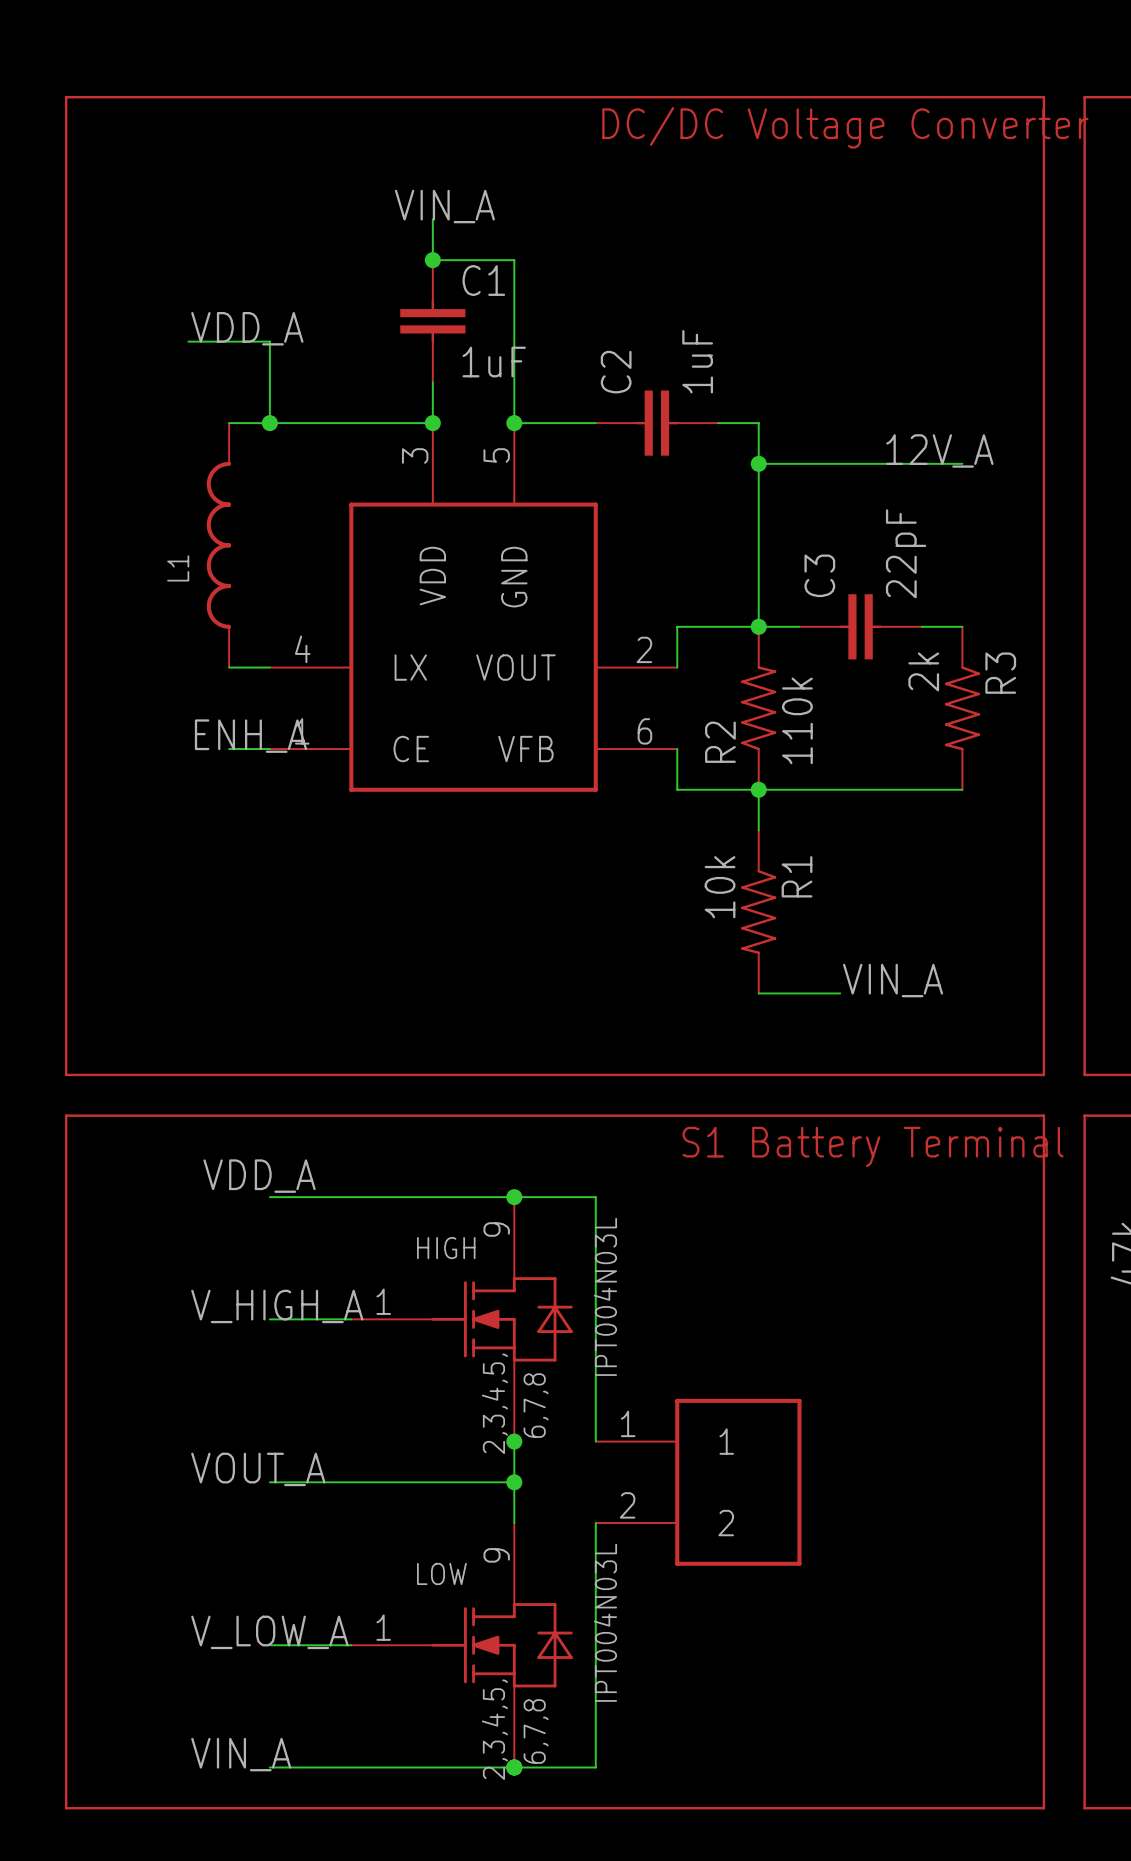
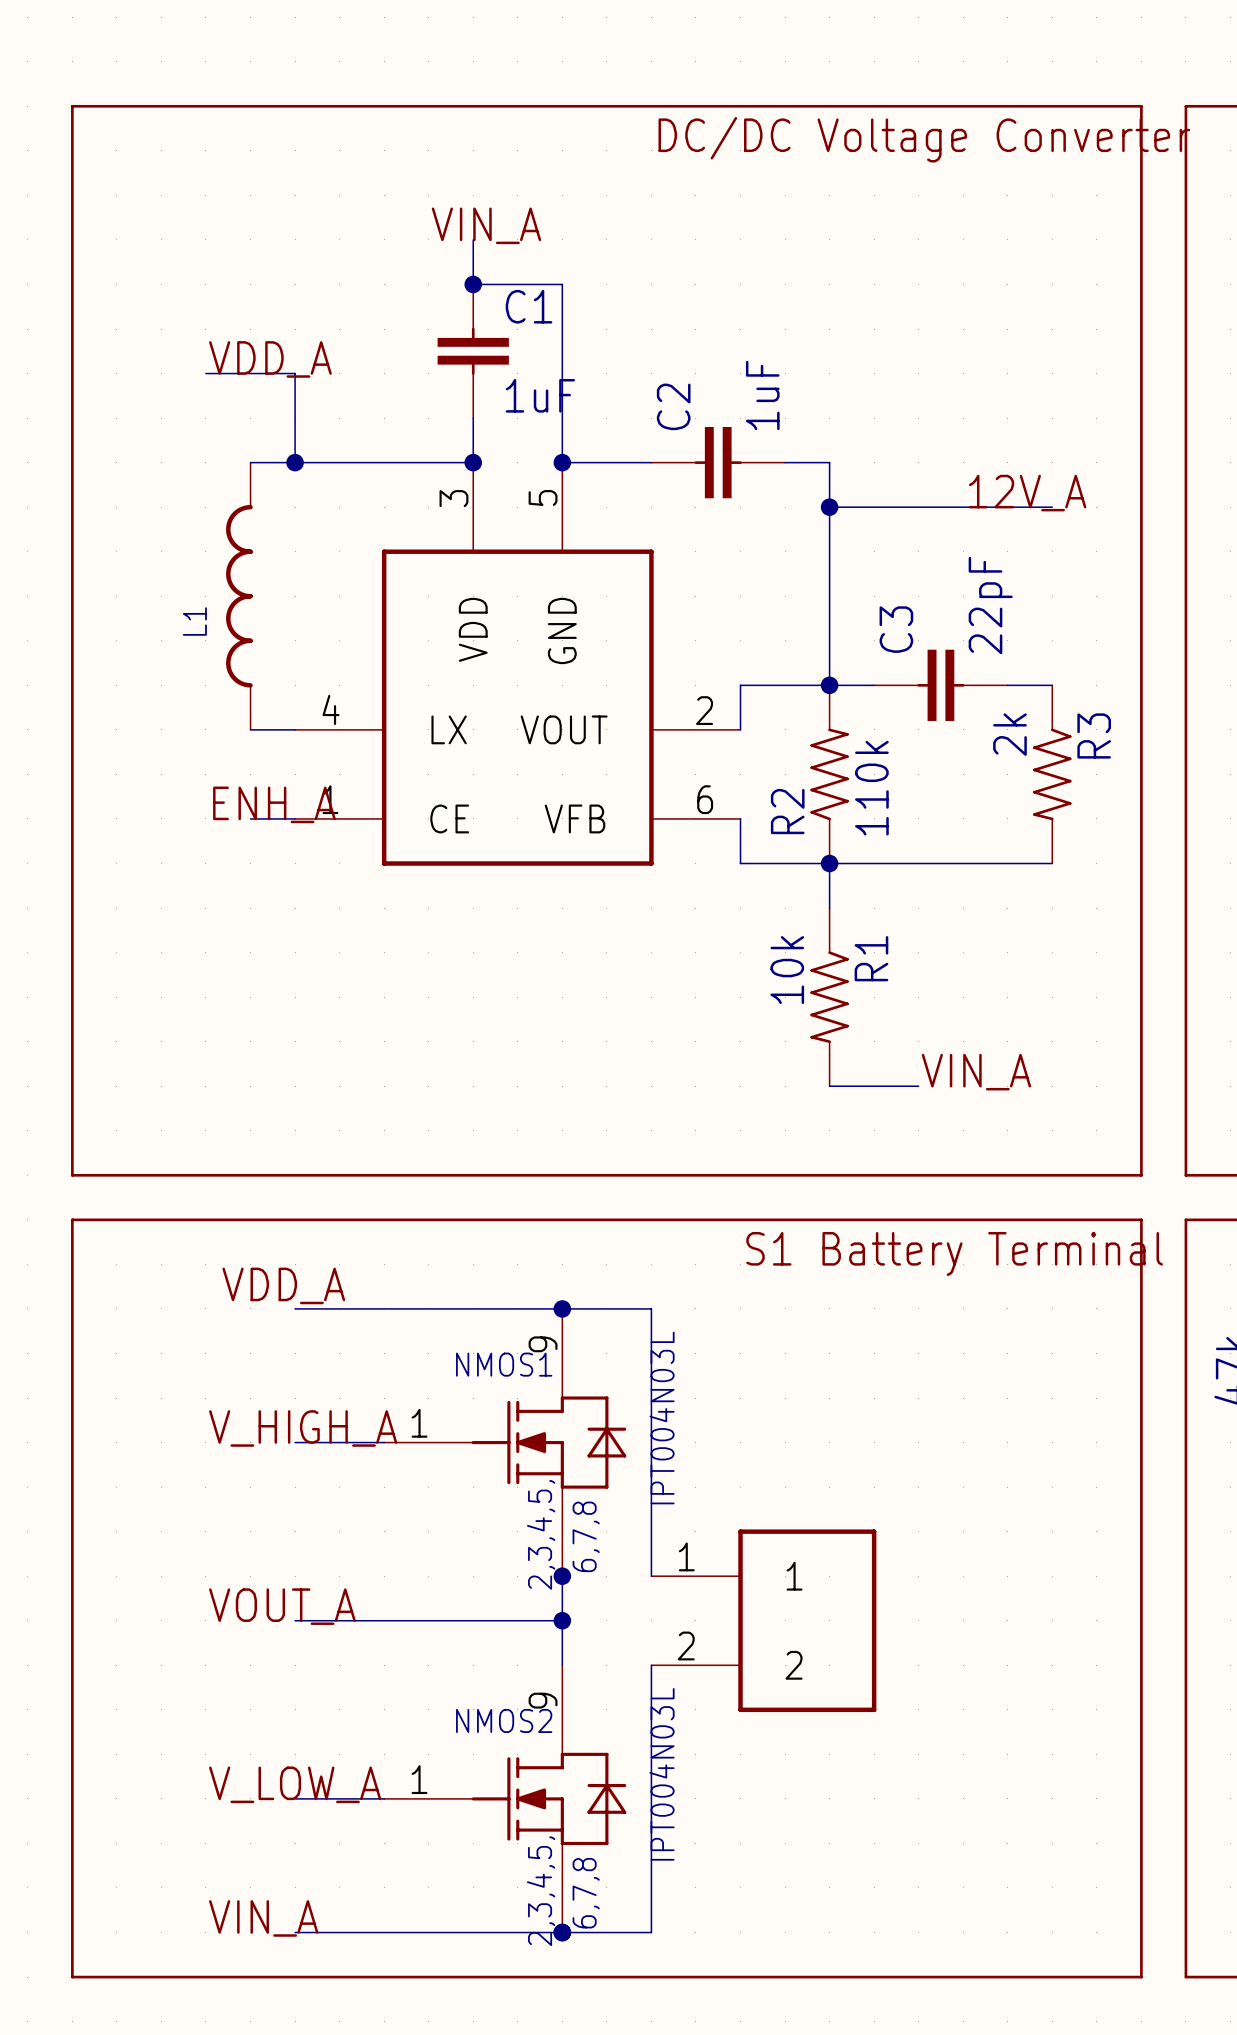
HIGH name: HIGH (446, 1248) -> NMOS1 (504, 1364)
LOW name: LOW (441, 1573) -> NMOS2 (504, 1720)

